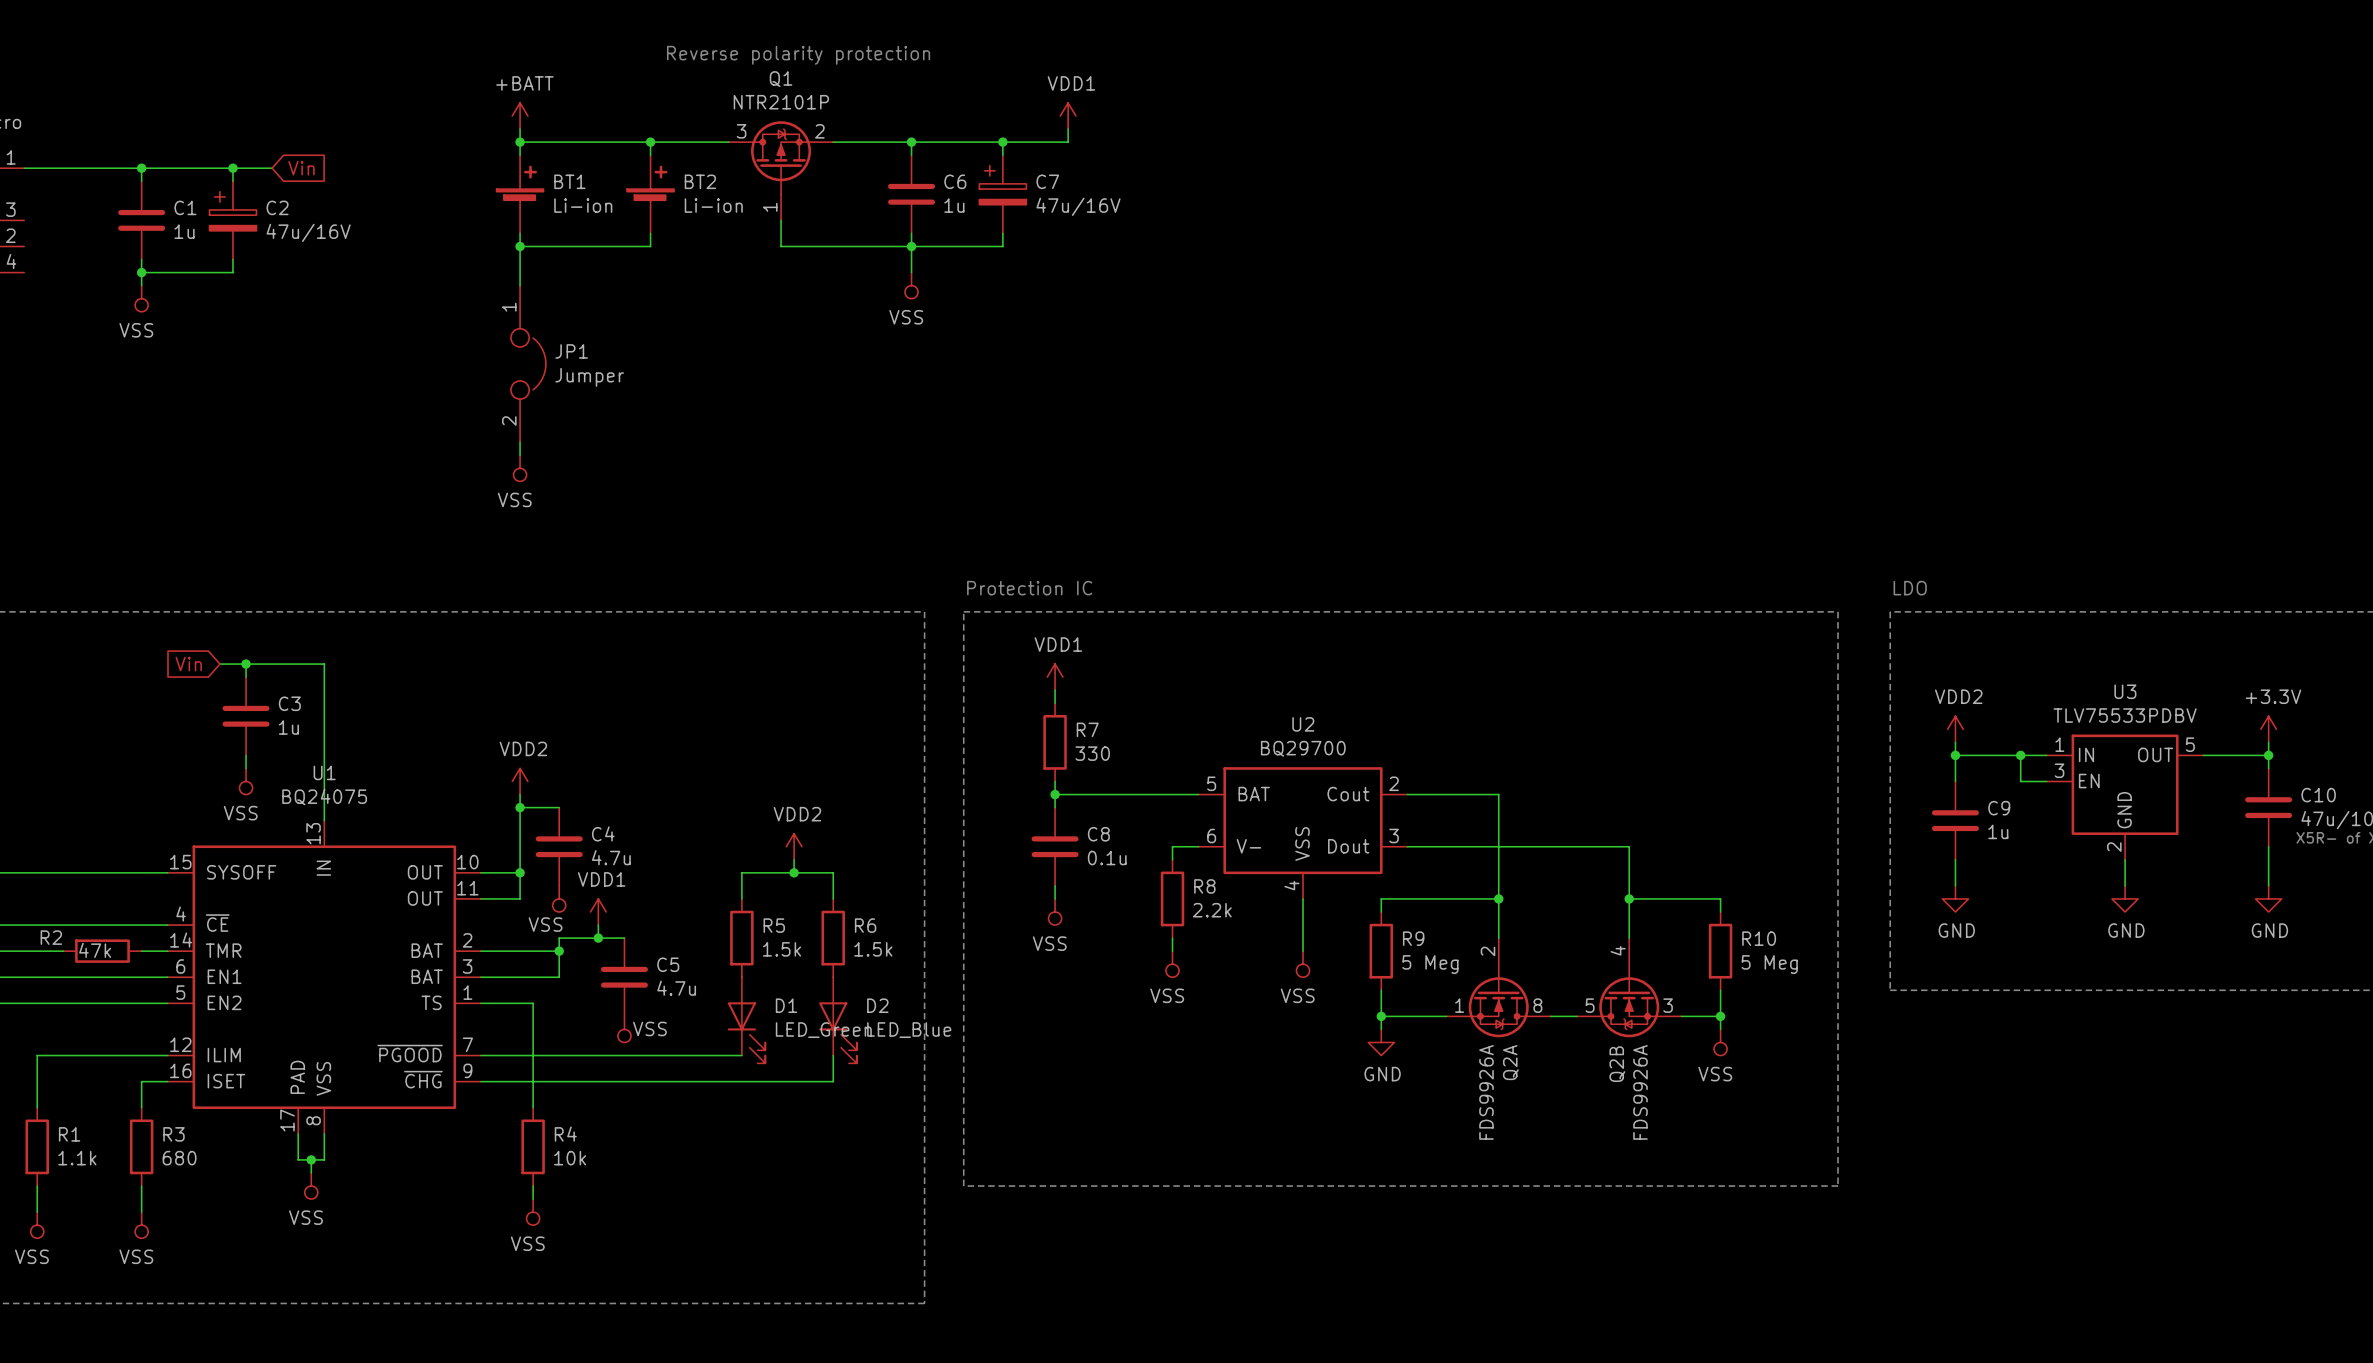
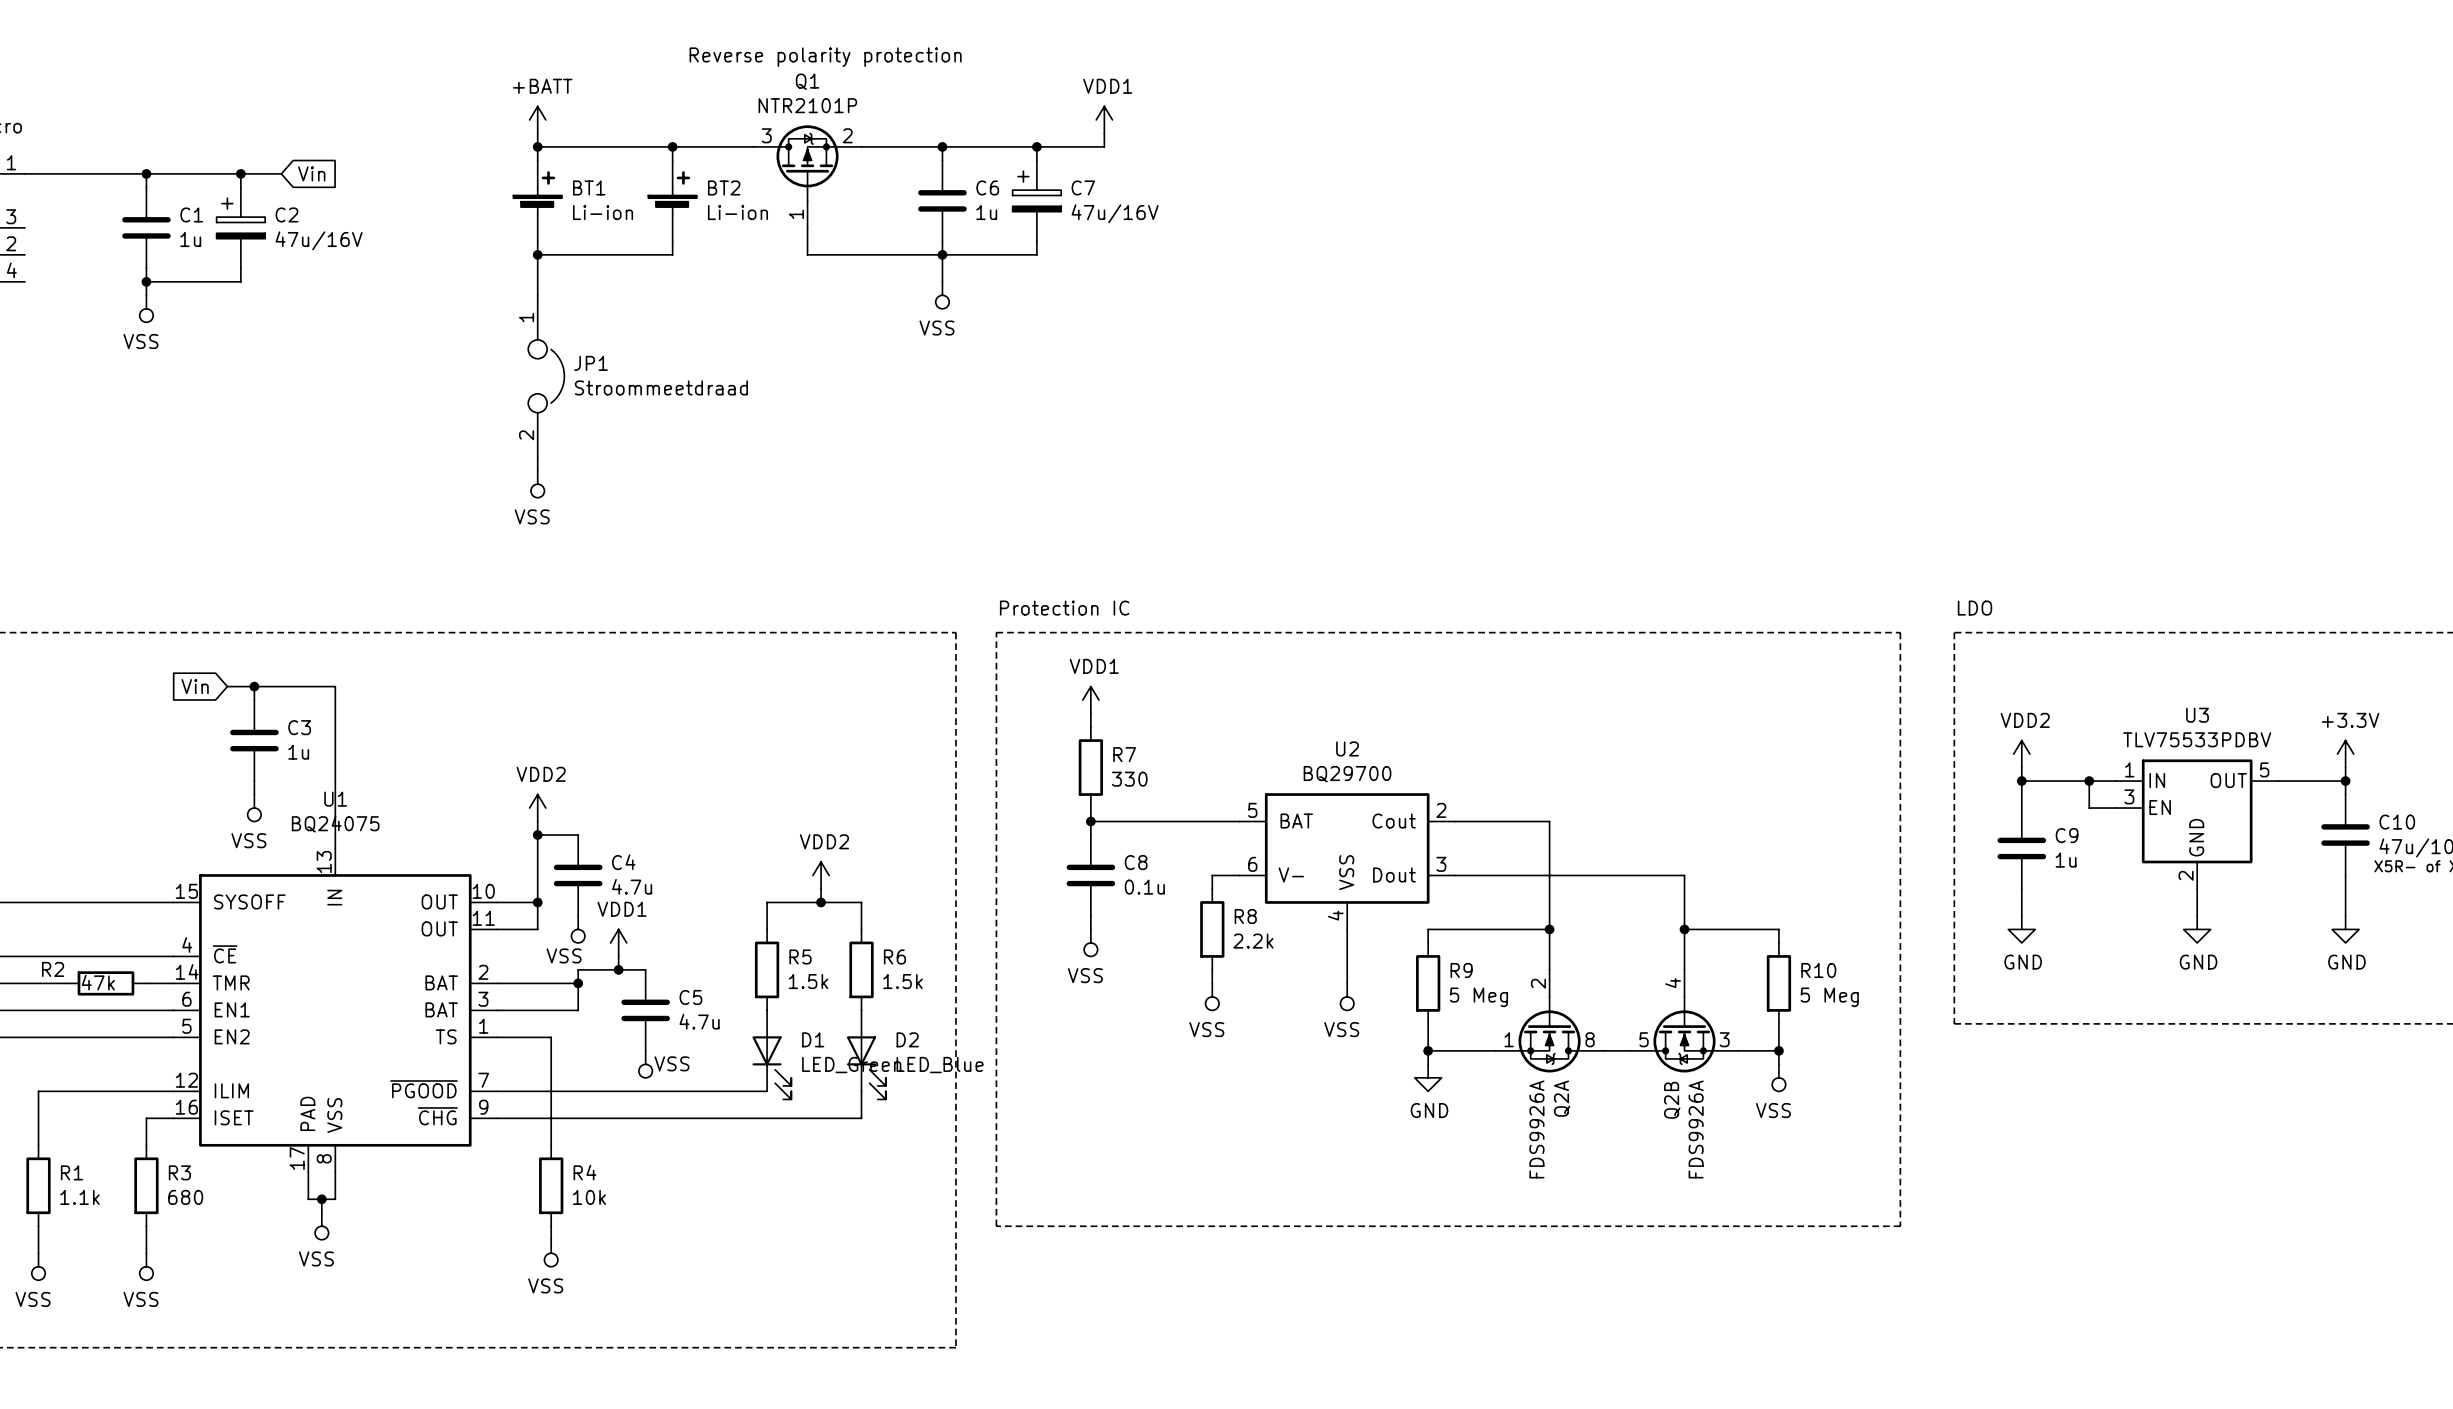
JP1 value: Jumper (589, 377) -> Stroommeetdraad (661, 387)

